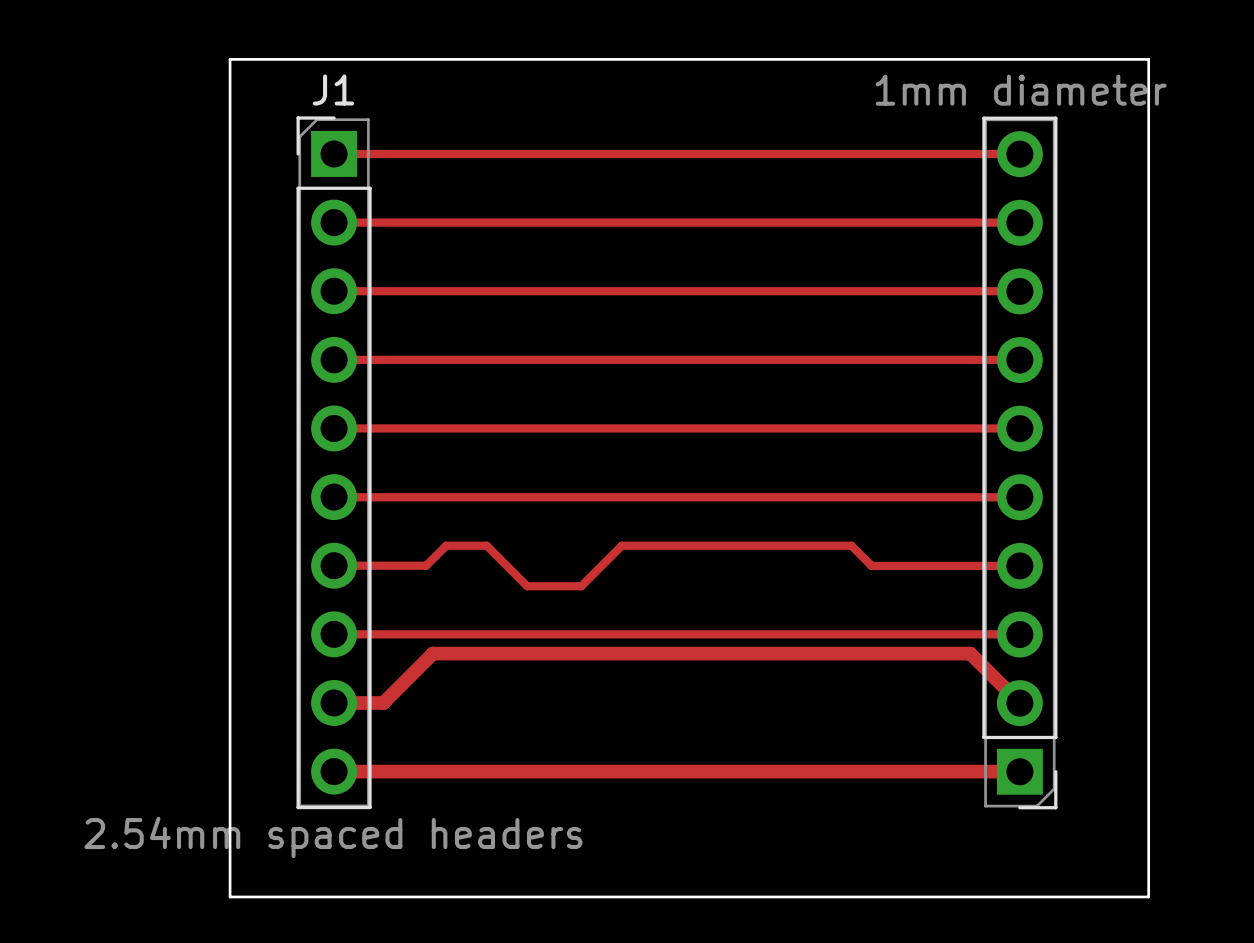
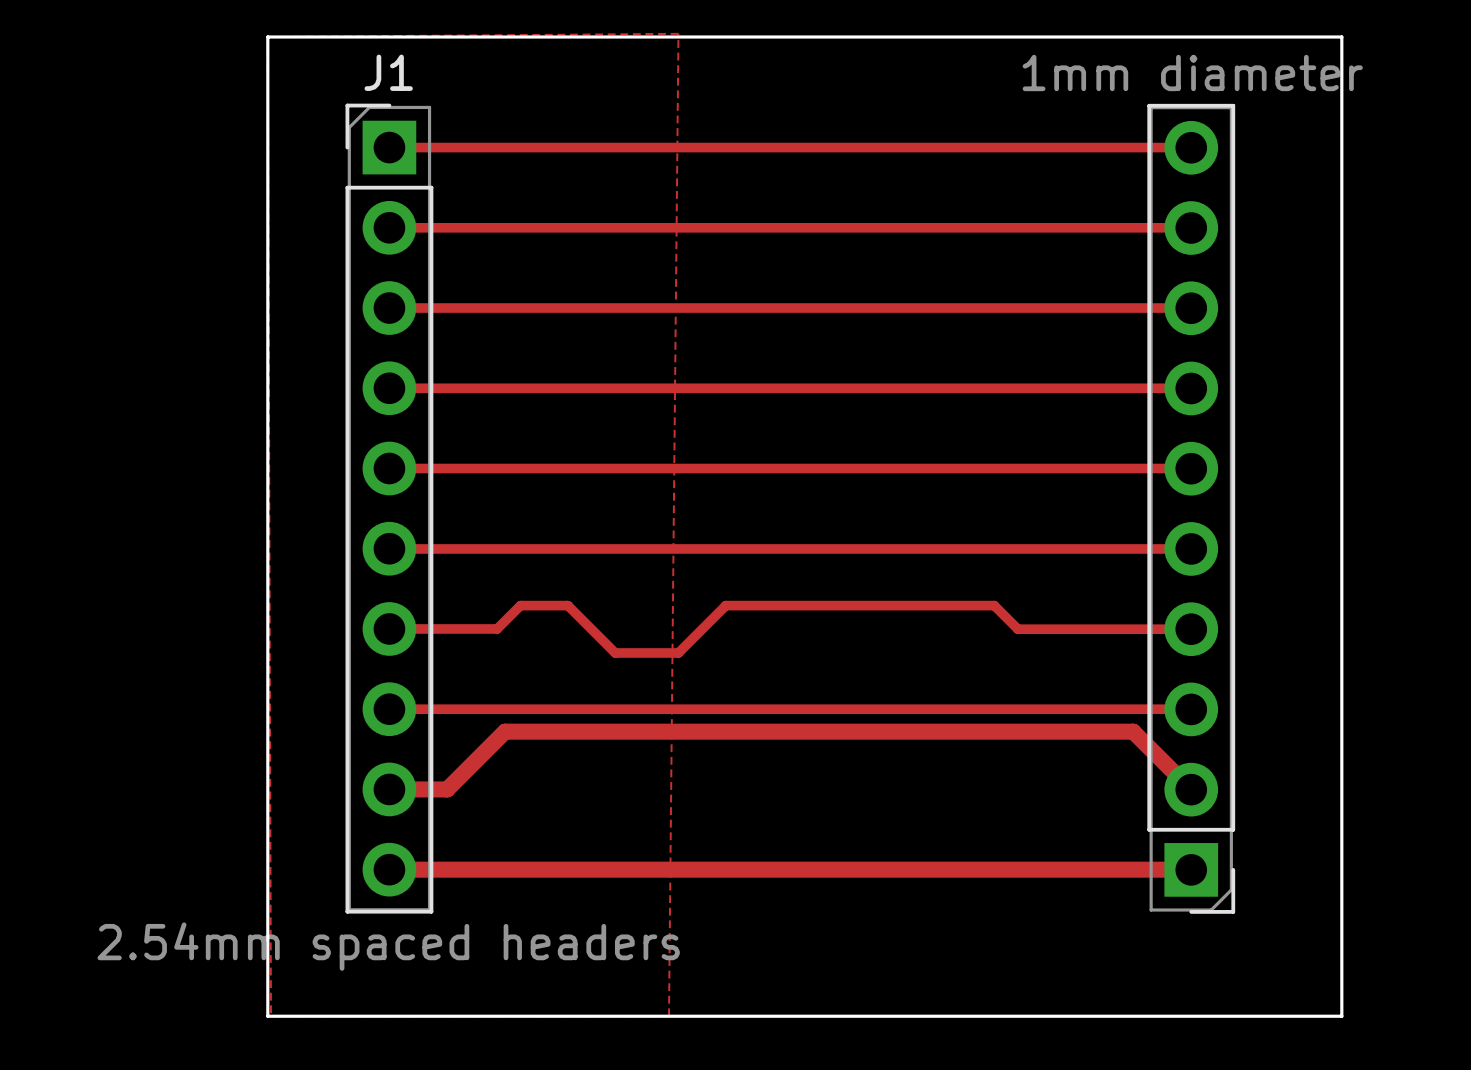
zone outline: none -> (678, 33) (668, 1016) (270, 1016) (267, 37) (678, 33)

